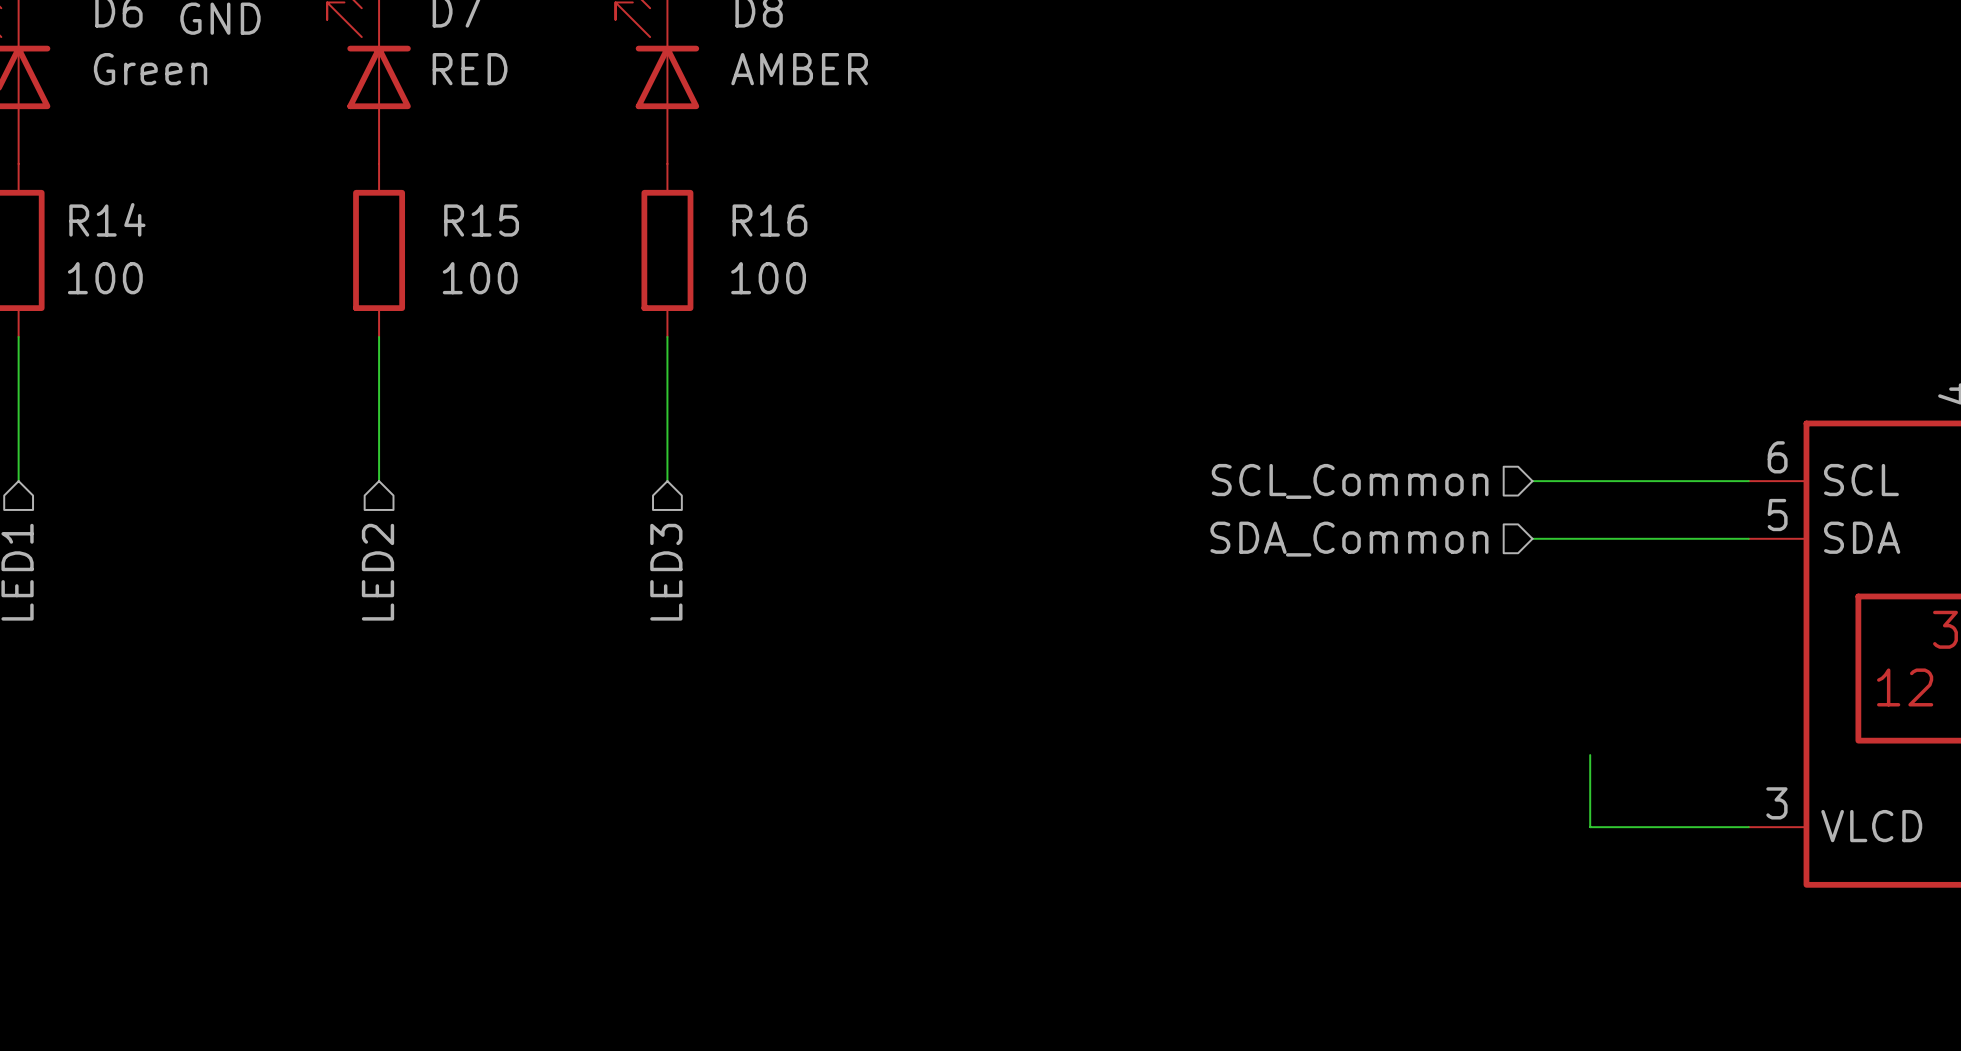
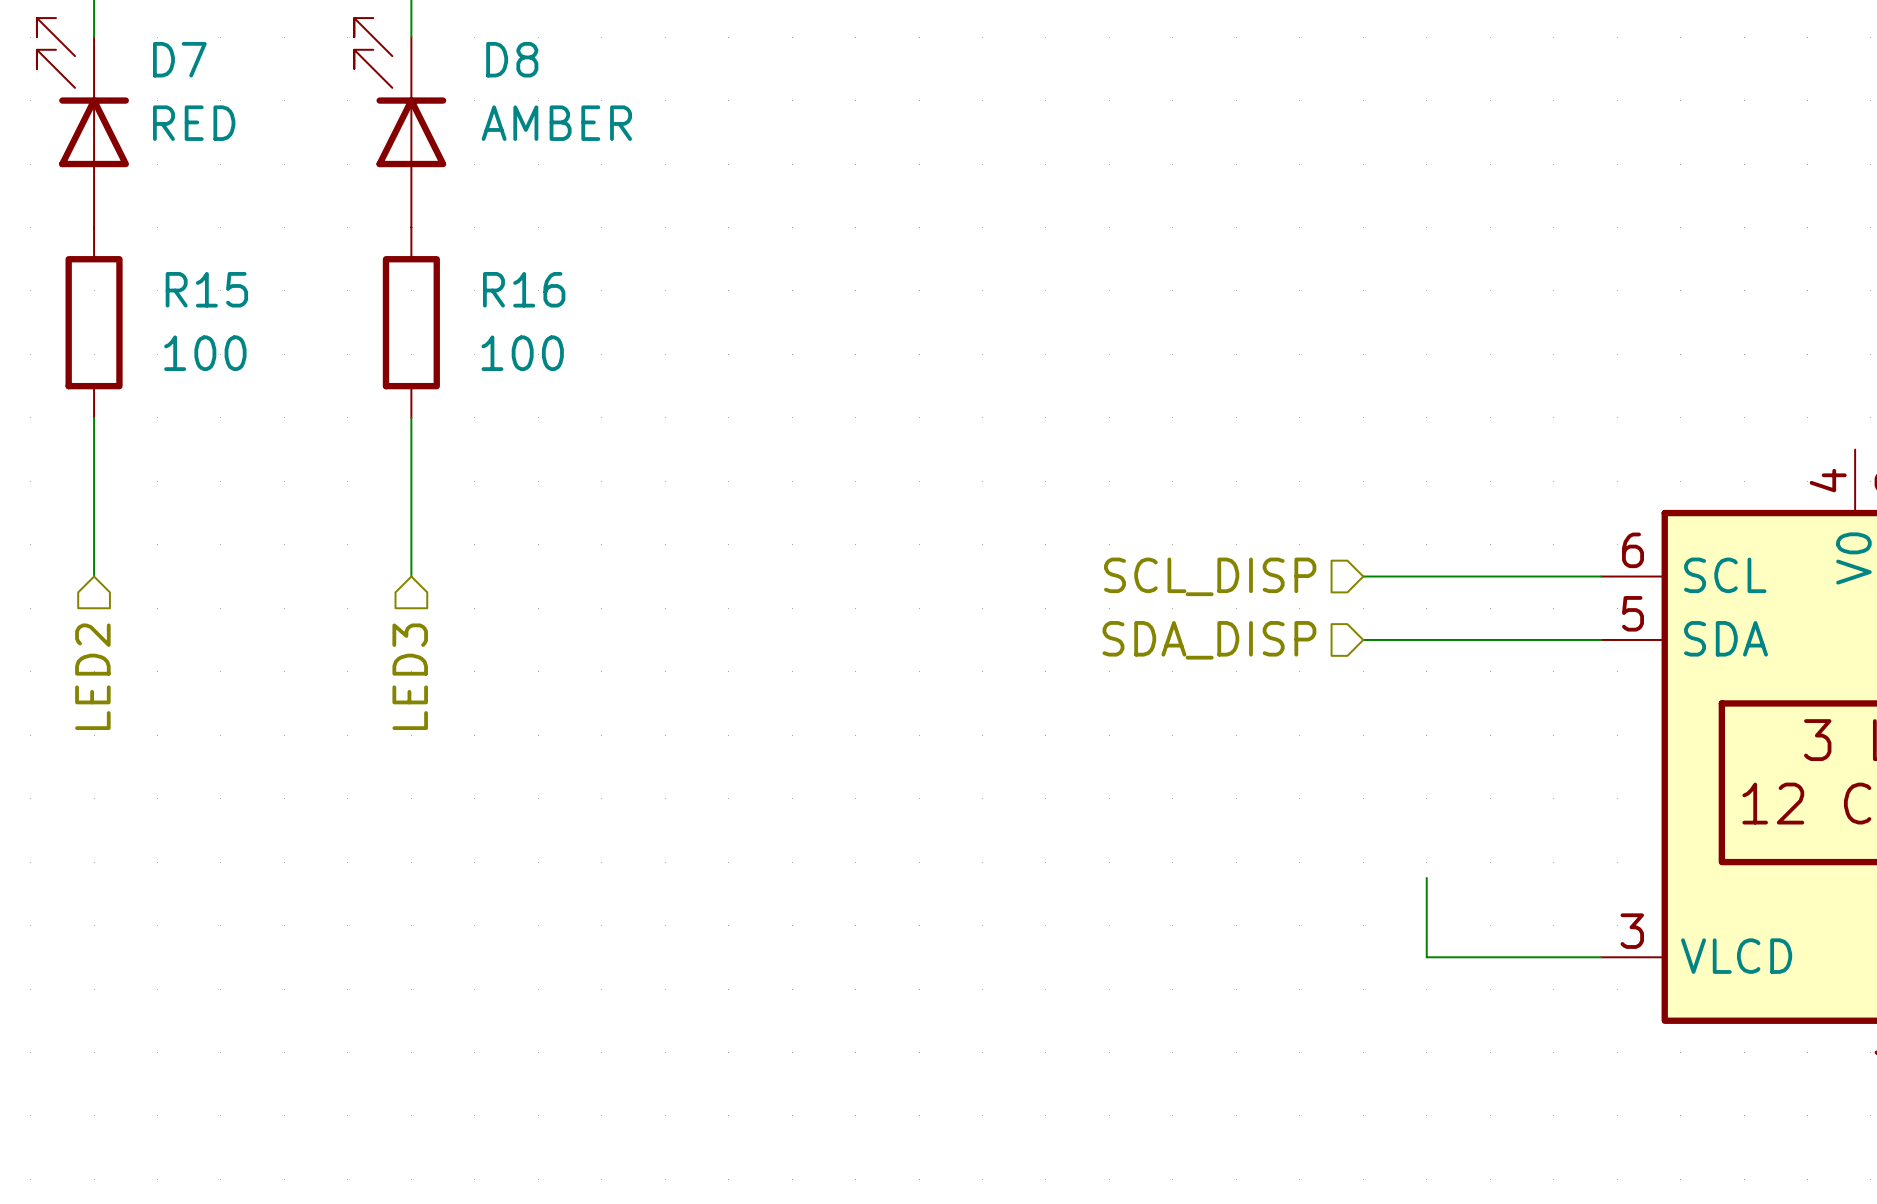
hierarchical label: SCL_Common (1350, 481) -> SCL_DISP (1210, 576)
hierarchical label: SDA_Common (1349, 539) -> SDA_DISP (1209, 640)

